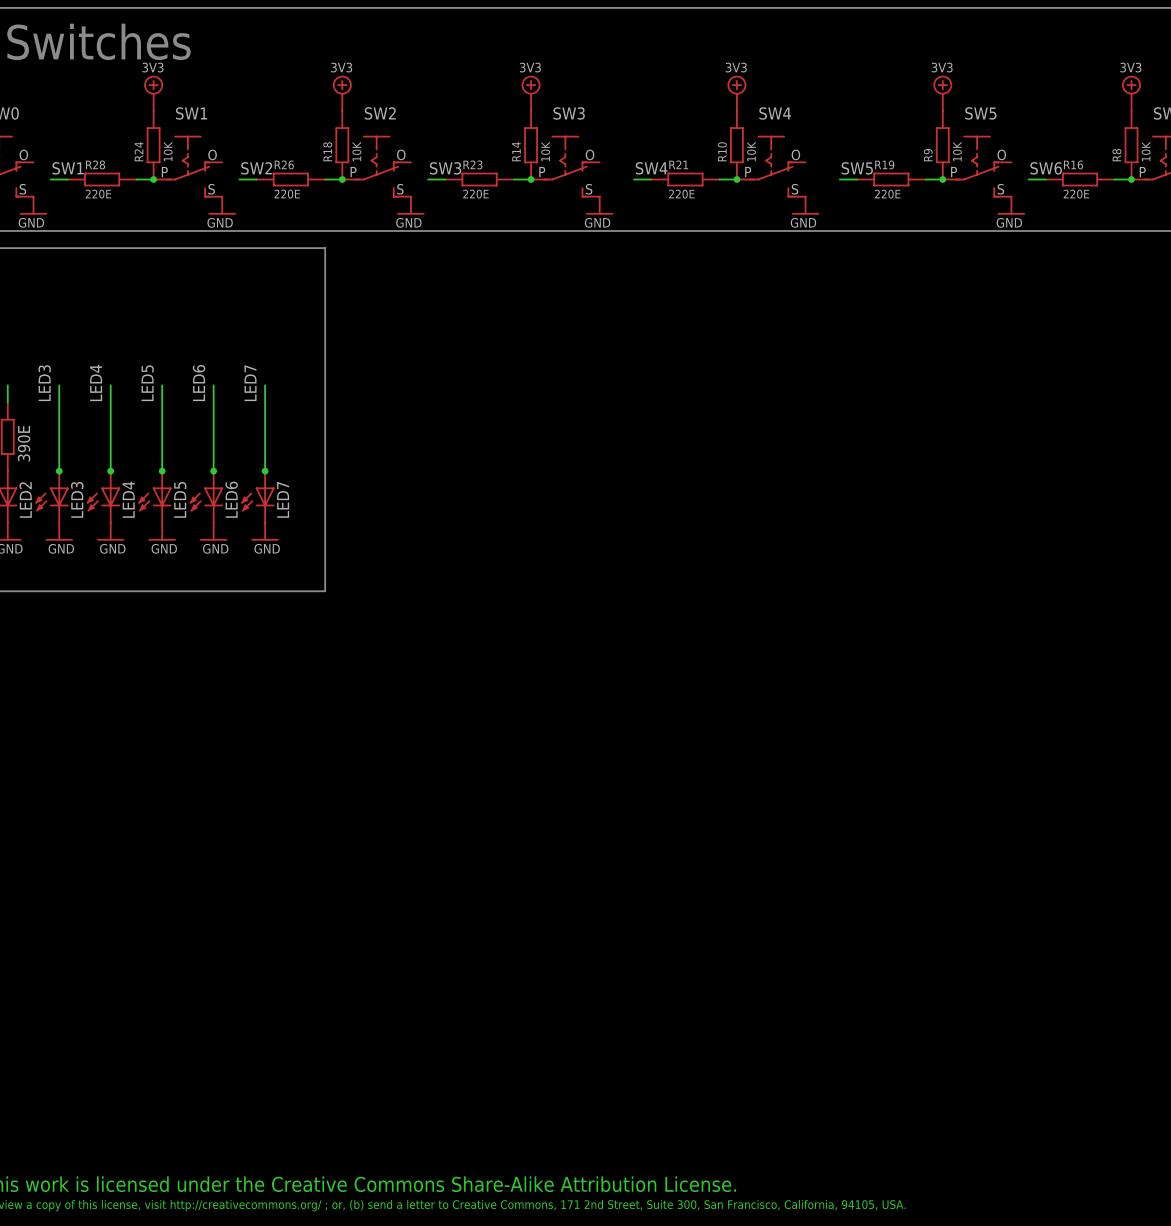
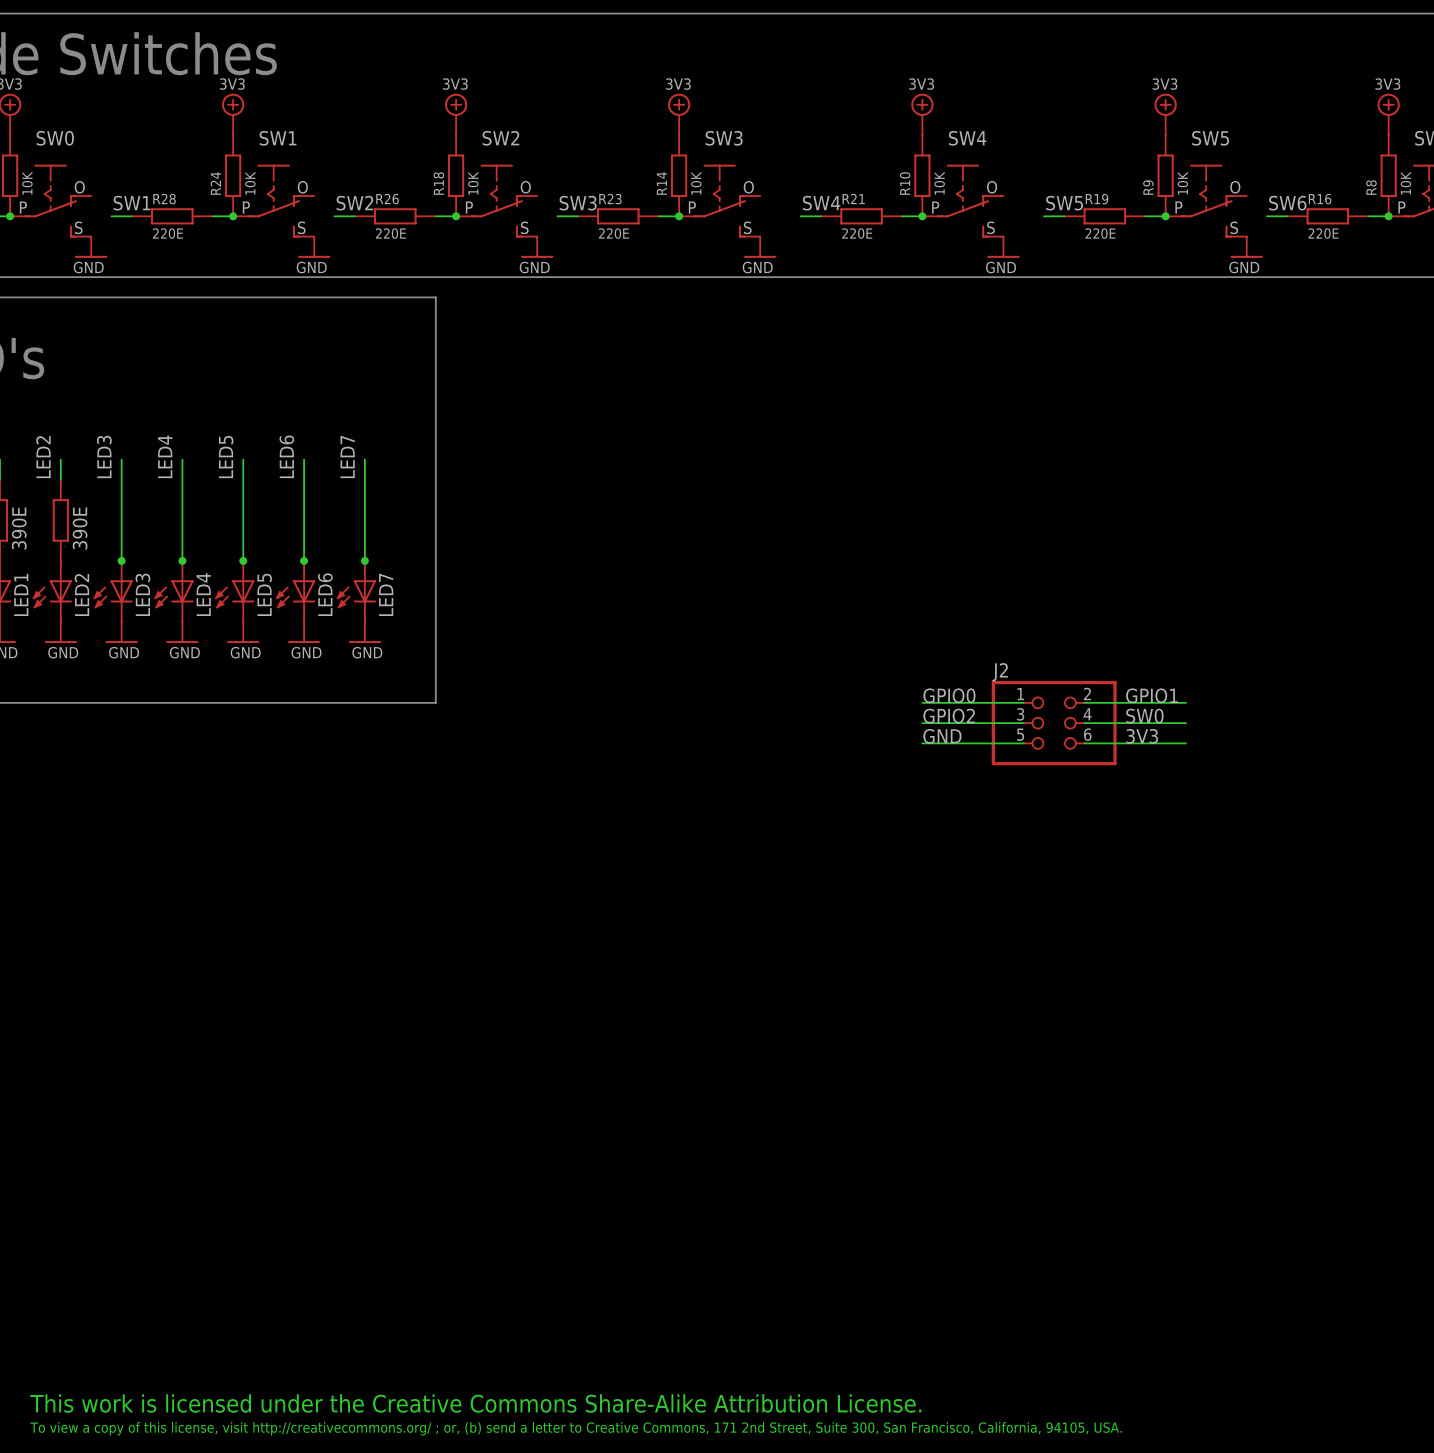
label: none -> GPIO0 (949, 695)
label: none -> GPIO1 (1151, 695)
wire: none -> (922, 702) (1023, 702)
wire: none -> (1084, 702) (1185, 702)
label: none -> GPIO2 (949, 716)
label: none -> SW0 (1144, 716)
wire: none -> (922, 723) (1023, 723)
J2: none -> (1054, 723)
wire: none -> (1084, 723) (1185, 723)
label: none -> GND (942, 736)
label: none -> 3V3 (1142, 736)
wire: none -> (922, 743) (1023, 743)
wire: none -> (1084, 743) (1185, 743)

